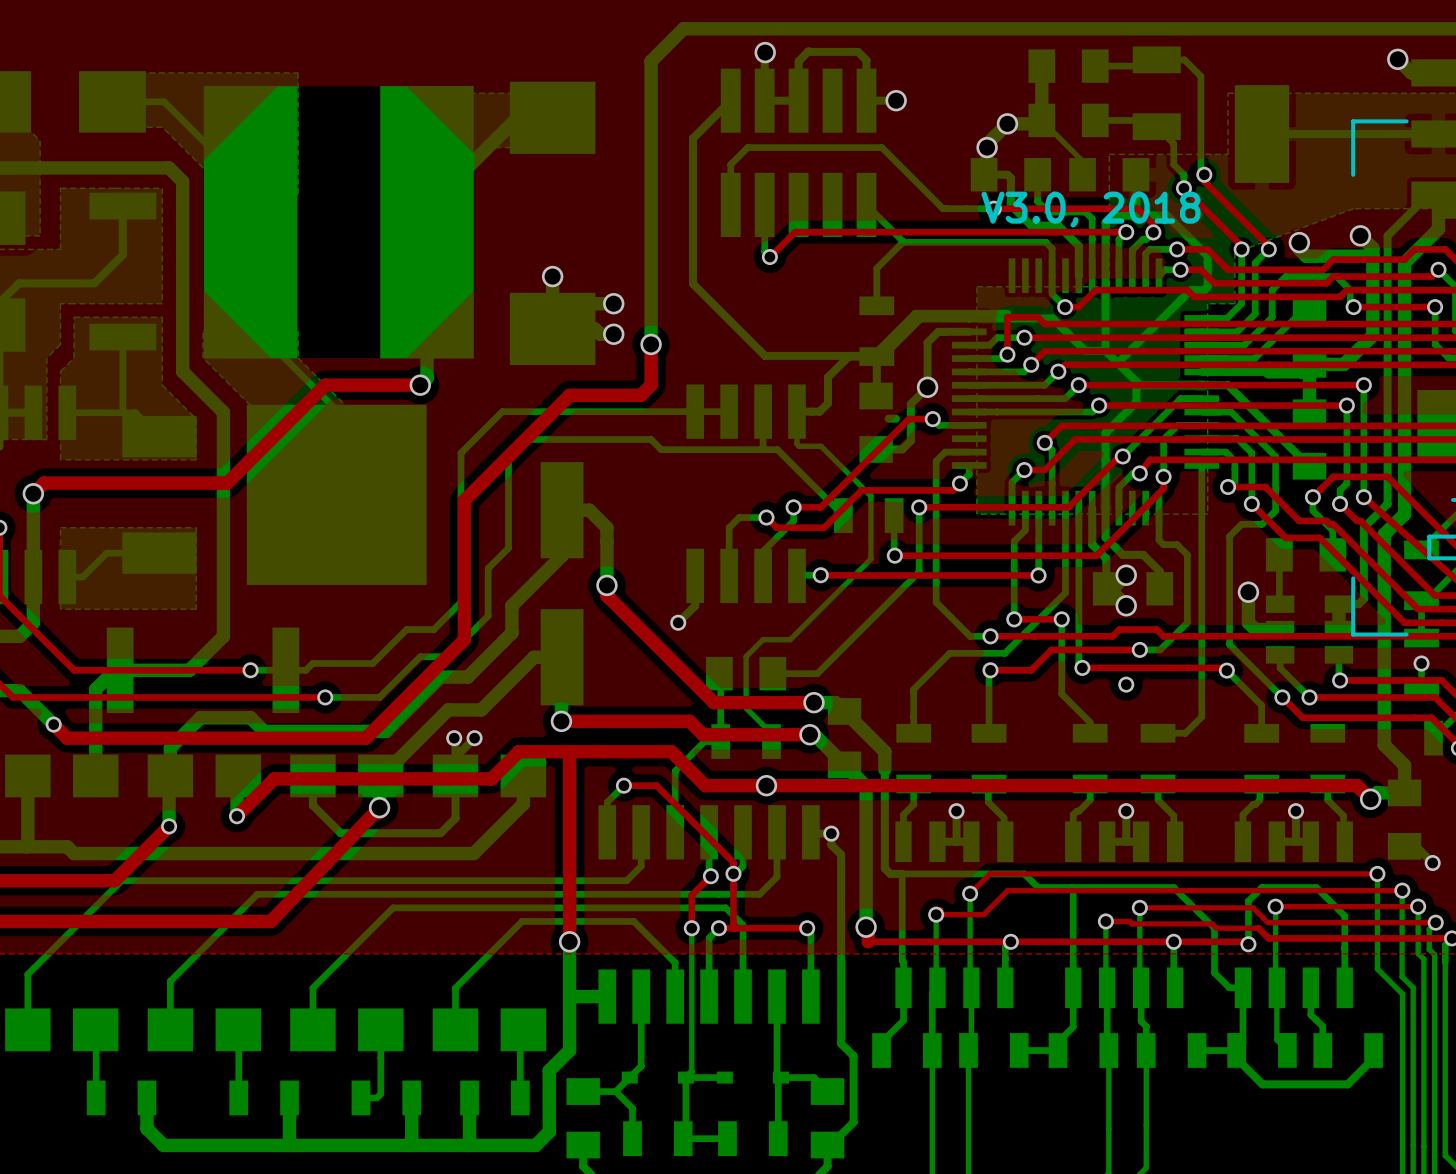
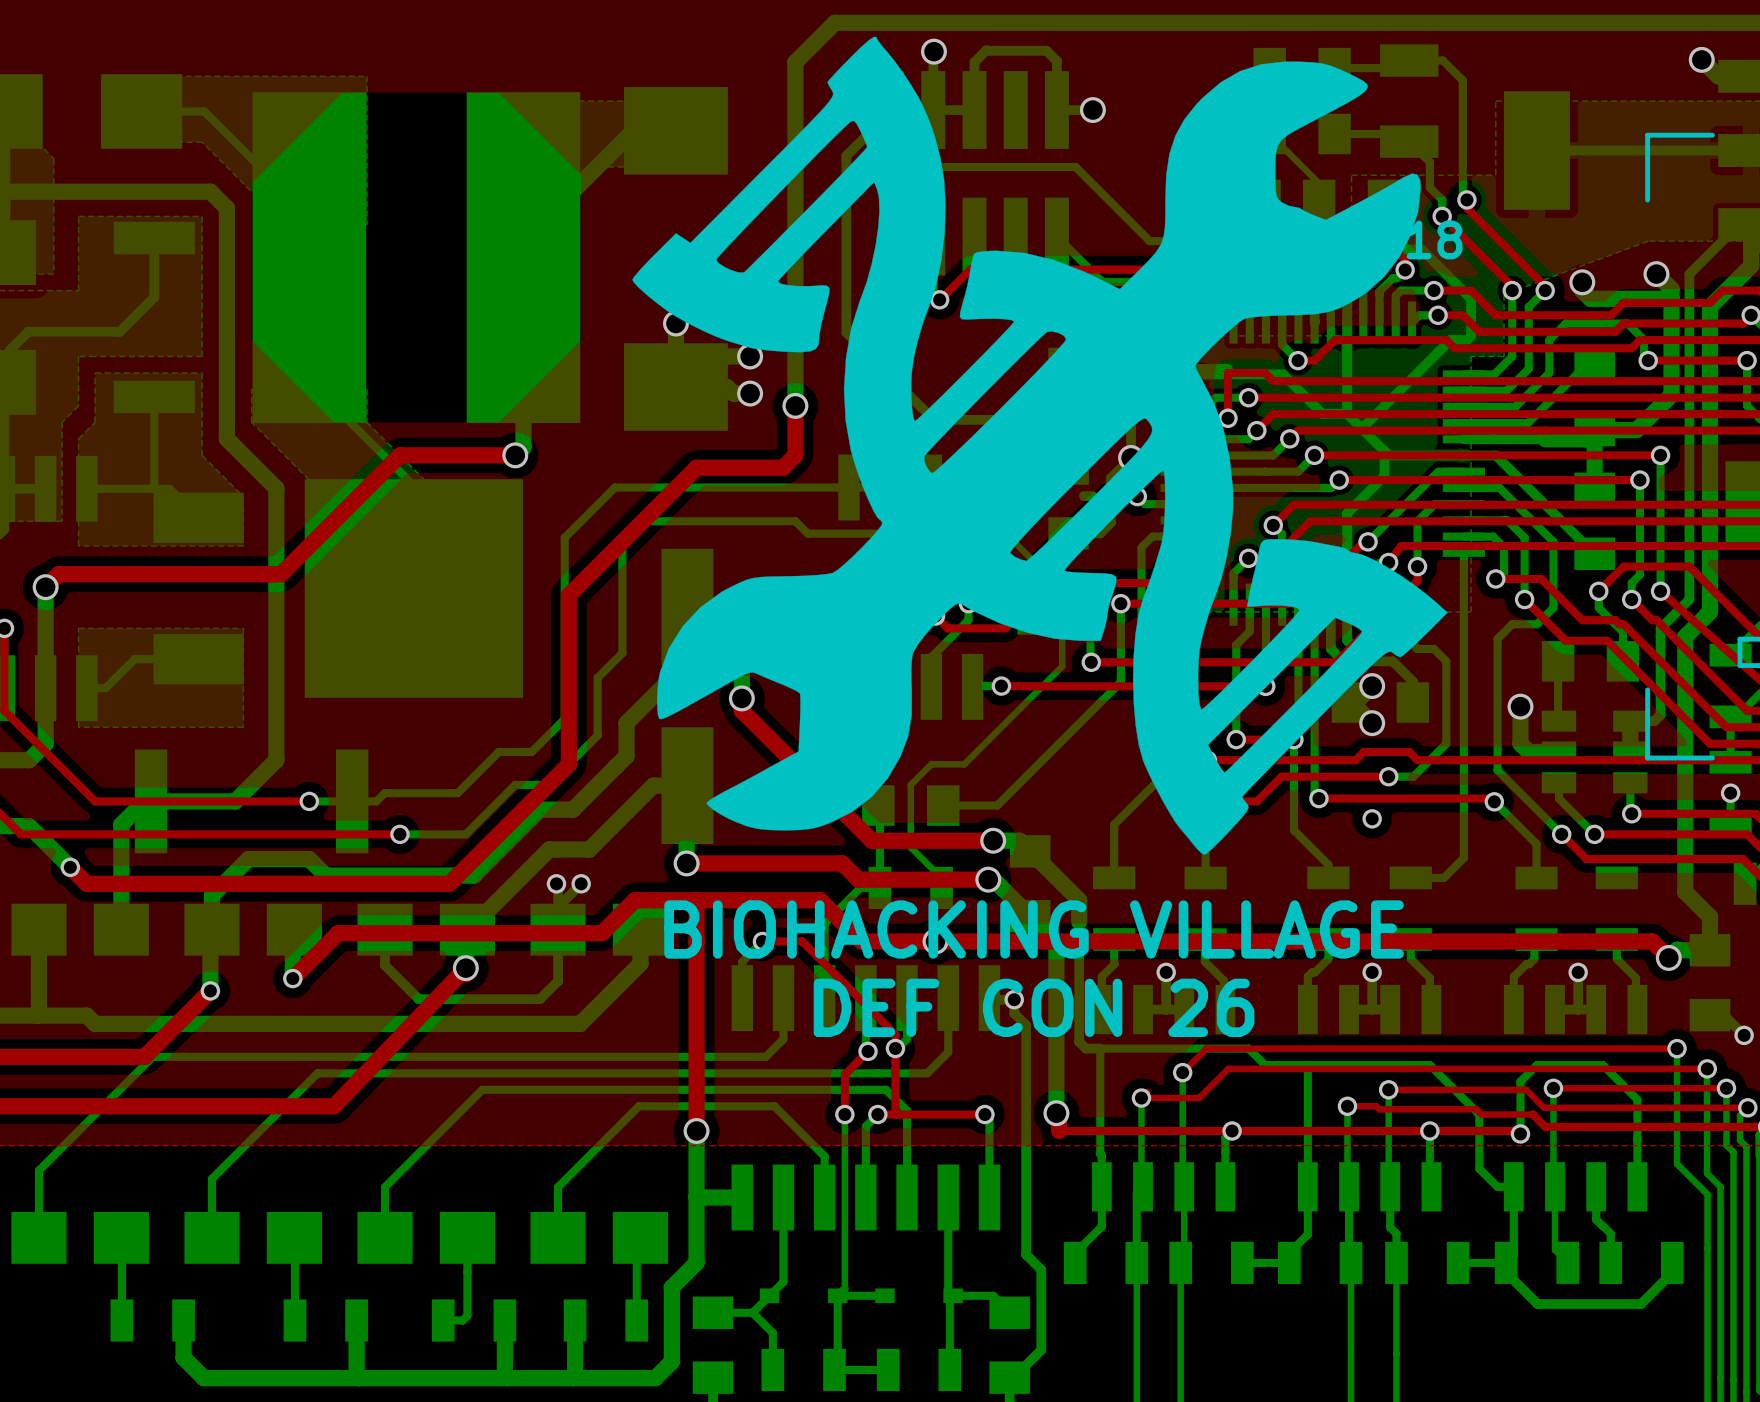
drawing: none -> [632, 36, 1448, 855]
text: none -> BIOHACKING VILLAGE (1034, 929)
text: none -> DEF CON 26 (1034, 1007)

